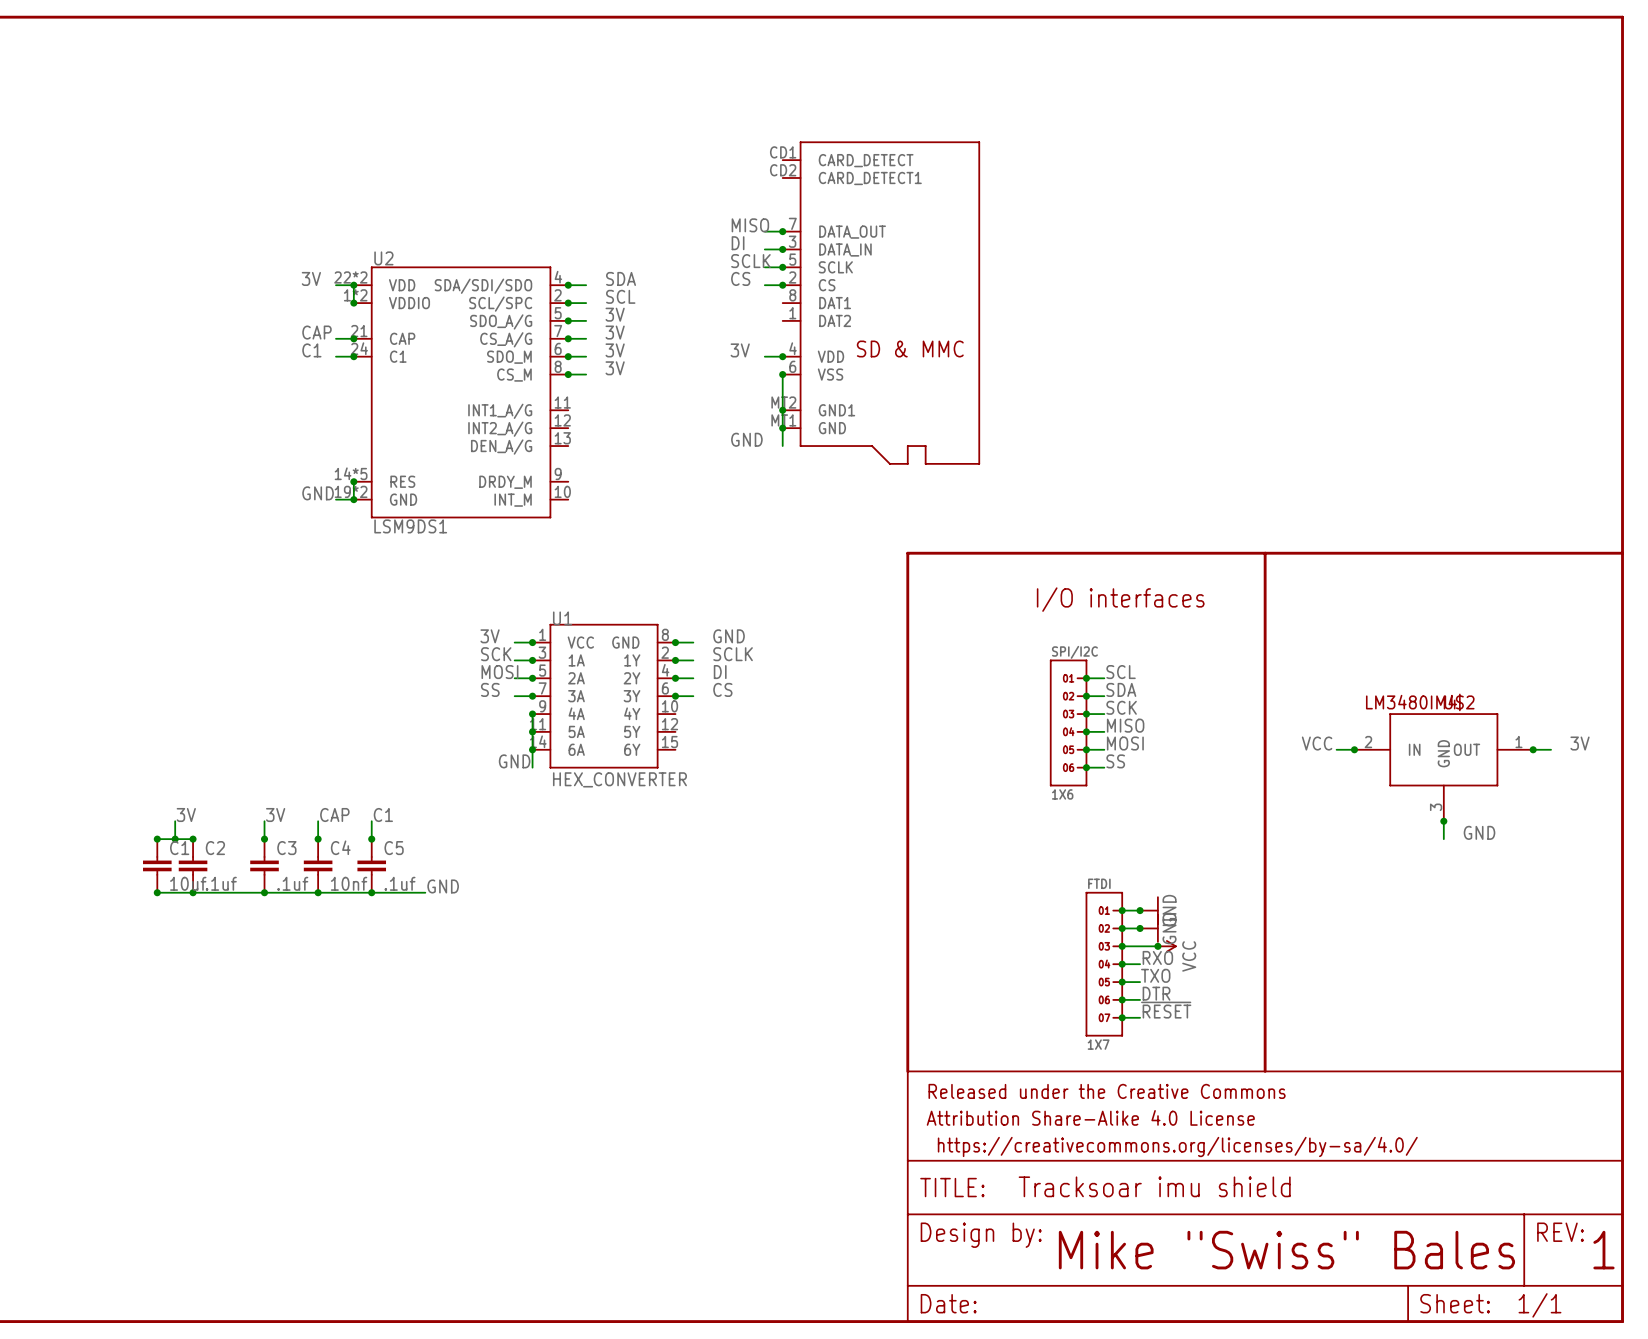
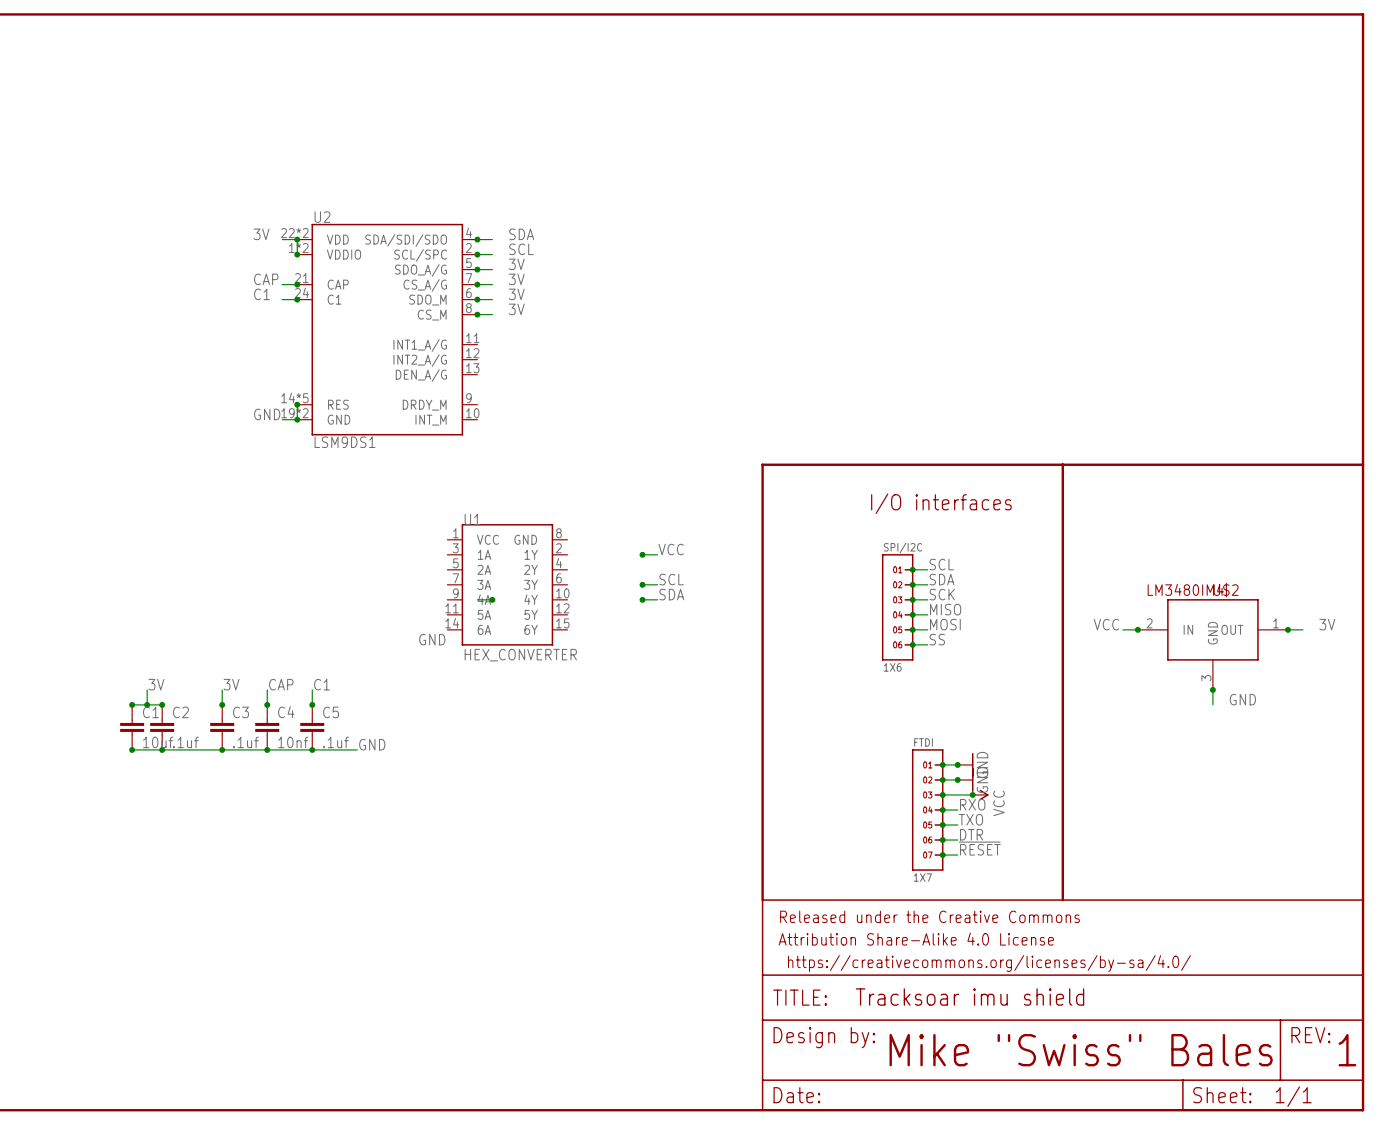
label: MISO (750, 225) -> none
wire: (764, 231) (782, 231) -> none
junction: (782, 231) -> none
label: DI (738, 243) -> none
wire: (764, 249) (782, 249) -> none
junction: (782, 249) -> none
label: SCLK (750, 261) -> none
wire: (764, 267) (782, 267) -> none
junction: (782, 267) -> none
label: CS (740, 278) -> none
wire: (764, 285) (782, 285) -> none
junction: (782, 285) -> none
part: (881, 303) -> none
label: 3V (740, 350) -> none
wire: (764, 356) (782, 356) -> none
junction: (782, 356) -> none
wire: (782, 374) (782, 446) -> none
junction: (782, 374) -> none
junction: (782, 410) -> none
junction: (782, 428) -> none
label: GND (746, 439) -> none
label: 3V (490, 636) -> none
label: GND (729, 636) -> none
wire: (514, 642) (532, 642) -> none
junction: (532, 642) -> none
wire: (675, 642) (693, 642) -> (642, 554) (657, 554)
junction: (675, 642) -> none
label: SCK (496, 654) -> none
label: SCLK (733, 654) -> none
label: none -> VCC (671, 549)
wire: (514, 660) (532, 660) -> none
junction: (532, 660) -> none
wire: (675, 660) (693, 660) -> none
junction: (675, 660) -> none
junction: none -> (642, 554)
label: MOSI (499, 672) -> none
label: DI (720, 672) -> none
wire: (514, 678) (532, 678) -> none
junction: (532, 678) -> none
wire: (675, 678) (693, 678) -> (642, 584) (657, 584)
junction: (675, 678) -> none
label: SS (490, 689) -> none
label: CS (722, 689) -> none
label: none -> SCL (671, 579)
wire: (514, 696) (532, 696) -> (477, 599) (492, 599)
junction: (532, 696) -> none
wire: (675, 696) (693, 696) -> (642, 599) (657, 599)
junction: (675, 696) -> none
junction: none -> (642, 584)
label: none -> SDA (671, 594)
wire: (532, 714) (532, 767) -> none
junction: (532, 714) -> none
junction: none -> (492, 599)
junction: none -> (642, 599)
junction: (532, 731) -> none
junction: (532, 749) -> none

